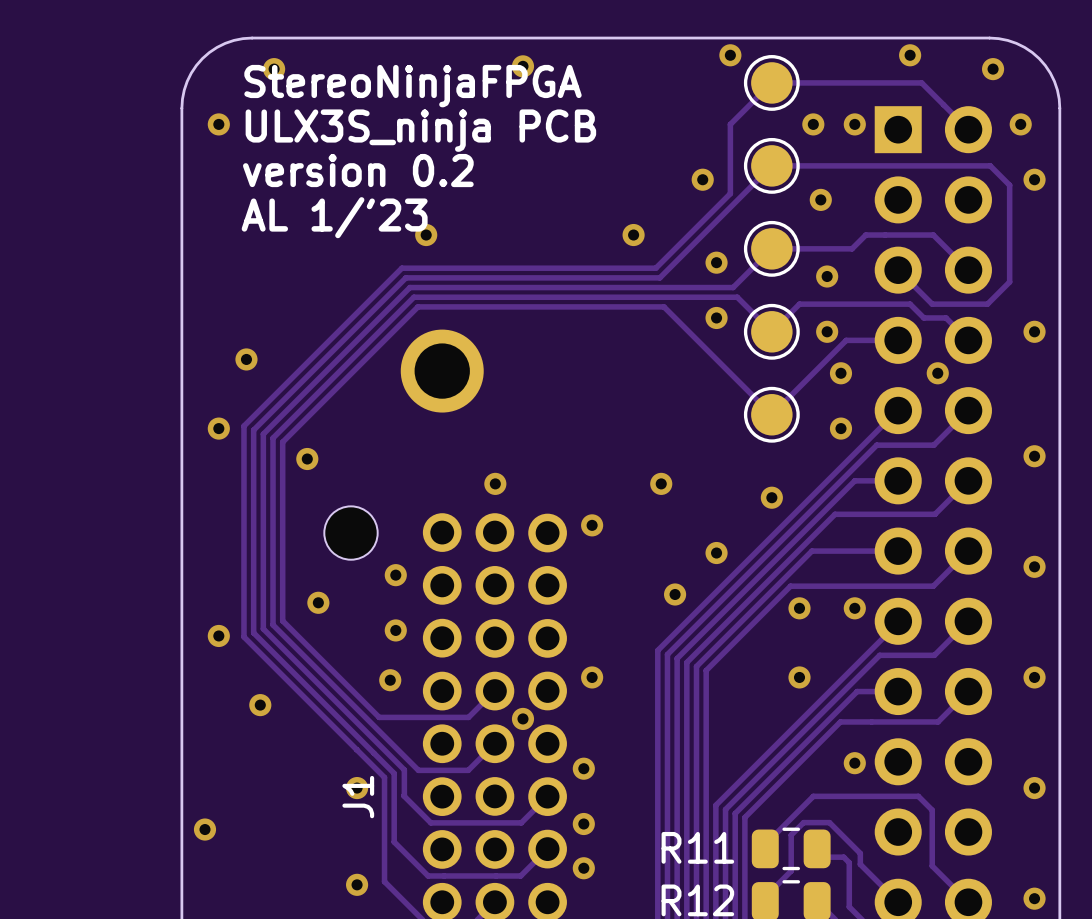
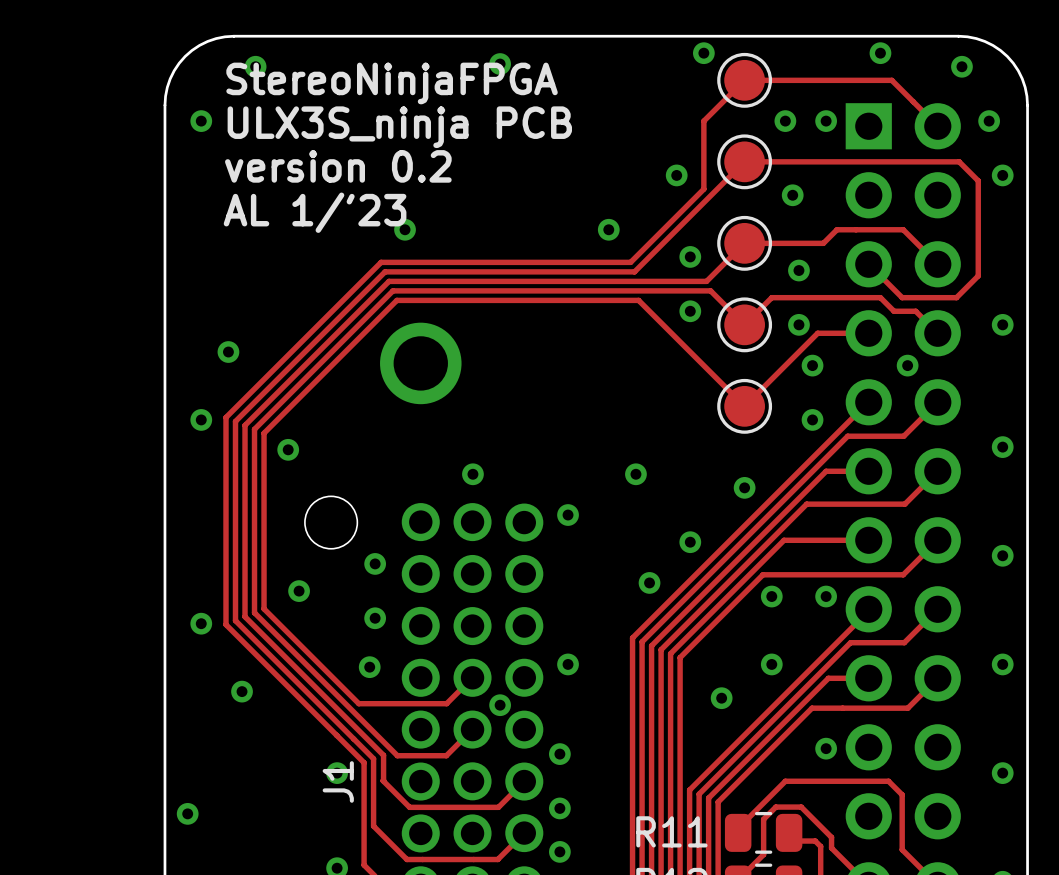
via: none -> (721, 698)

